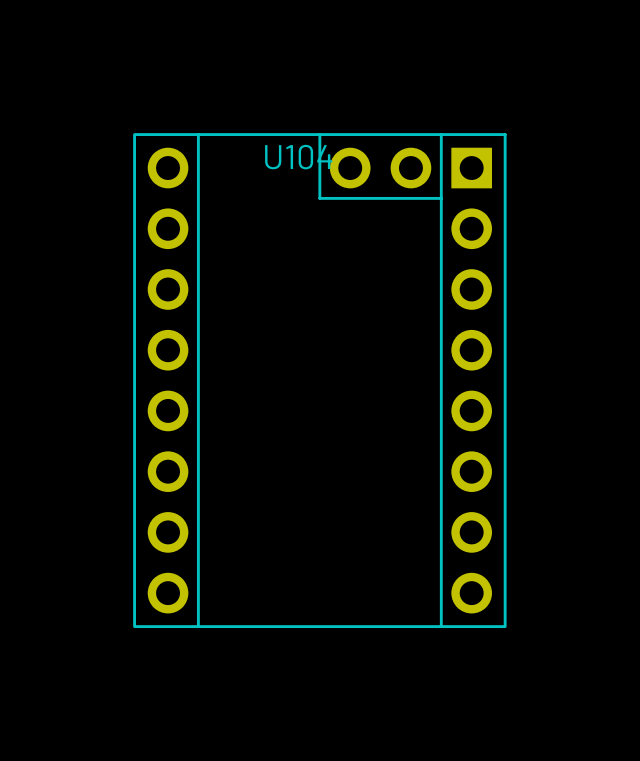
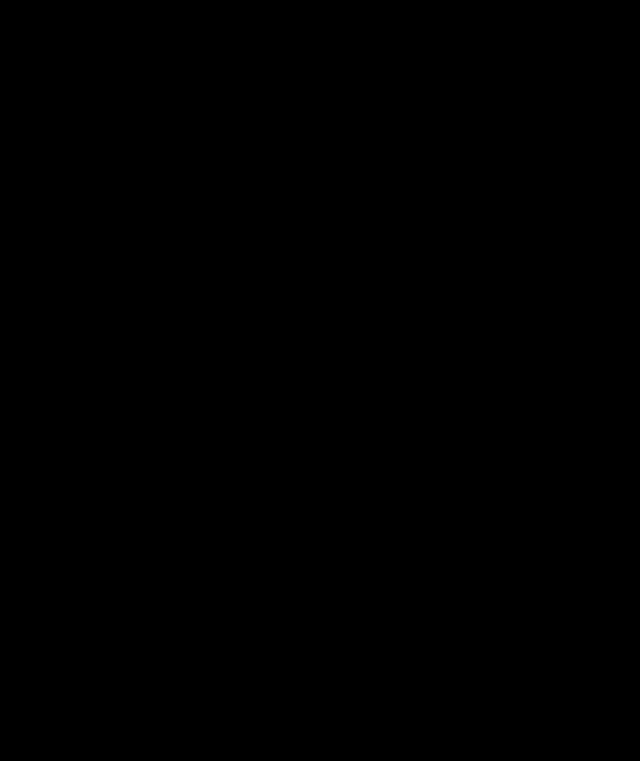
U104: (319, 380) -> none

